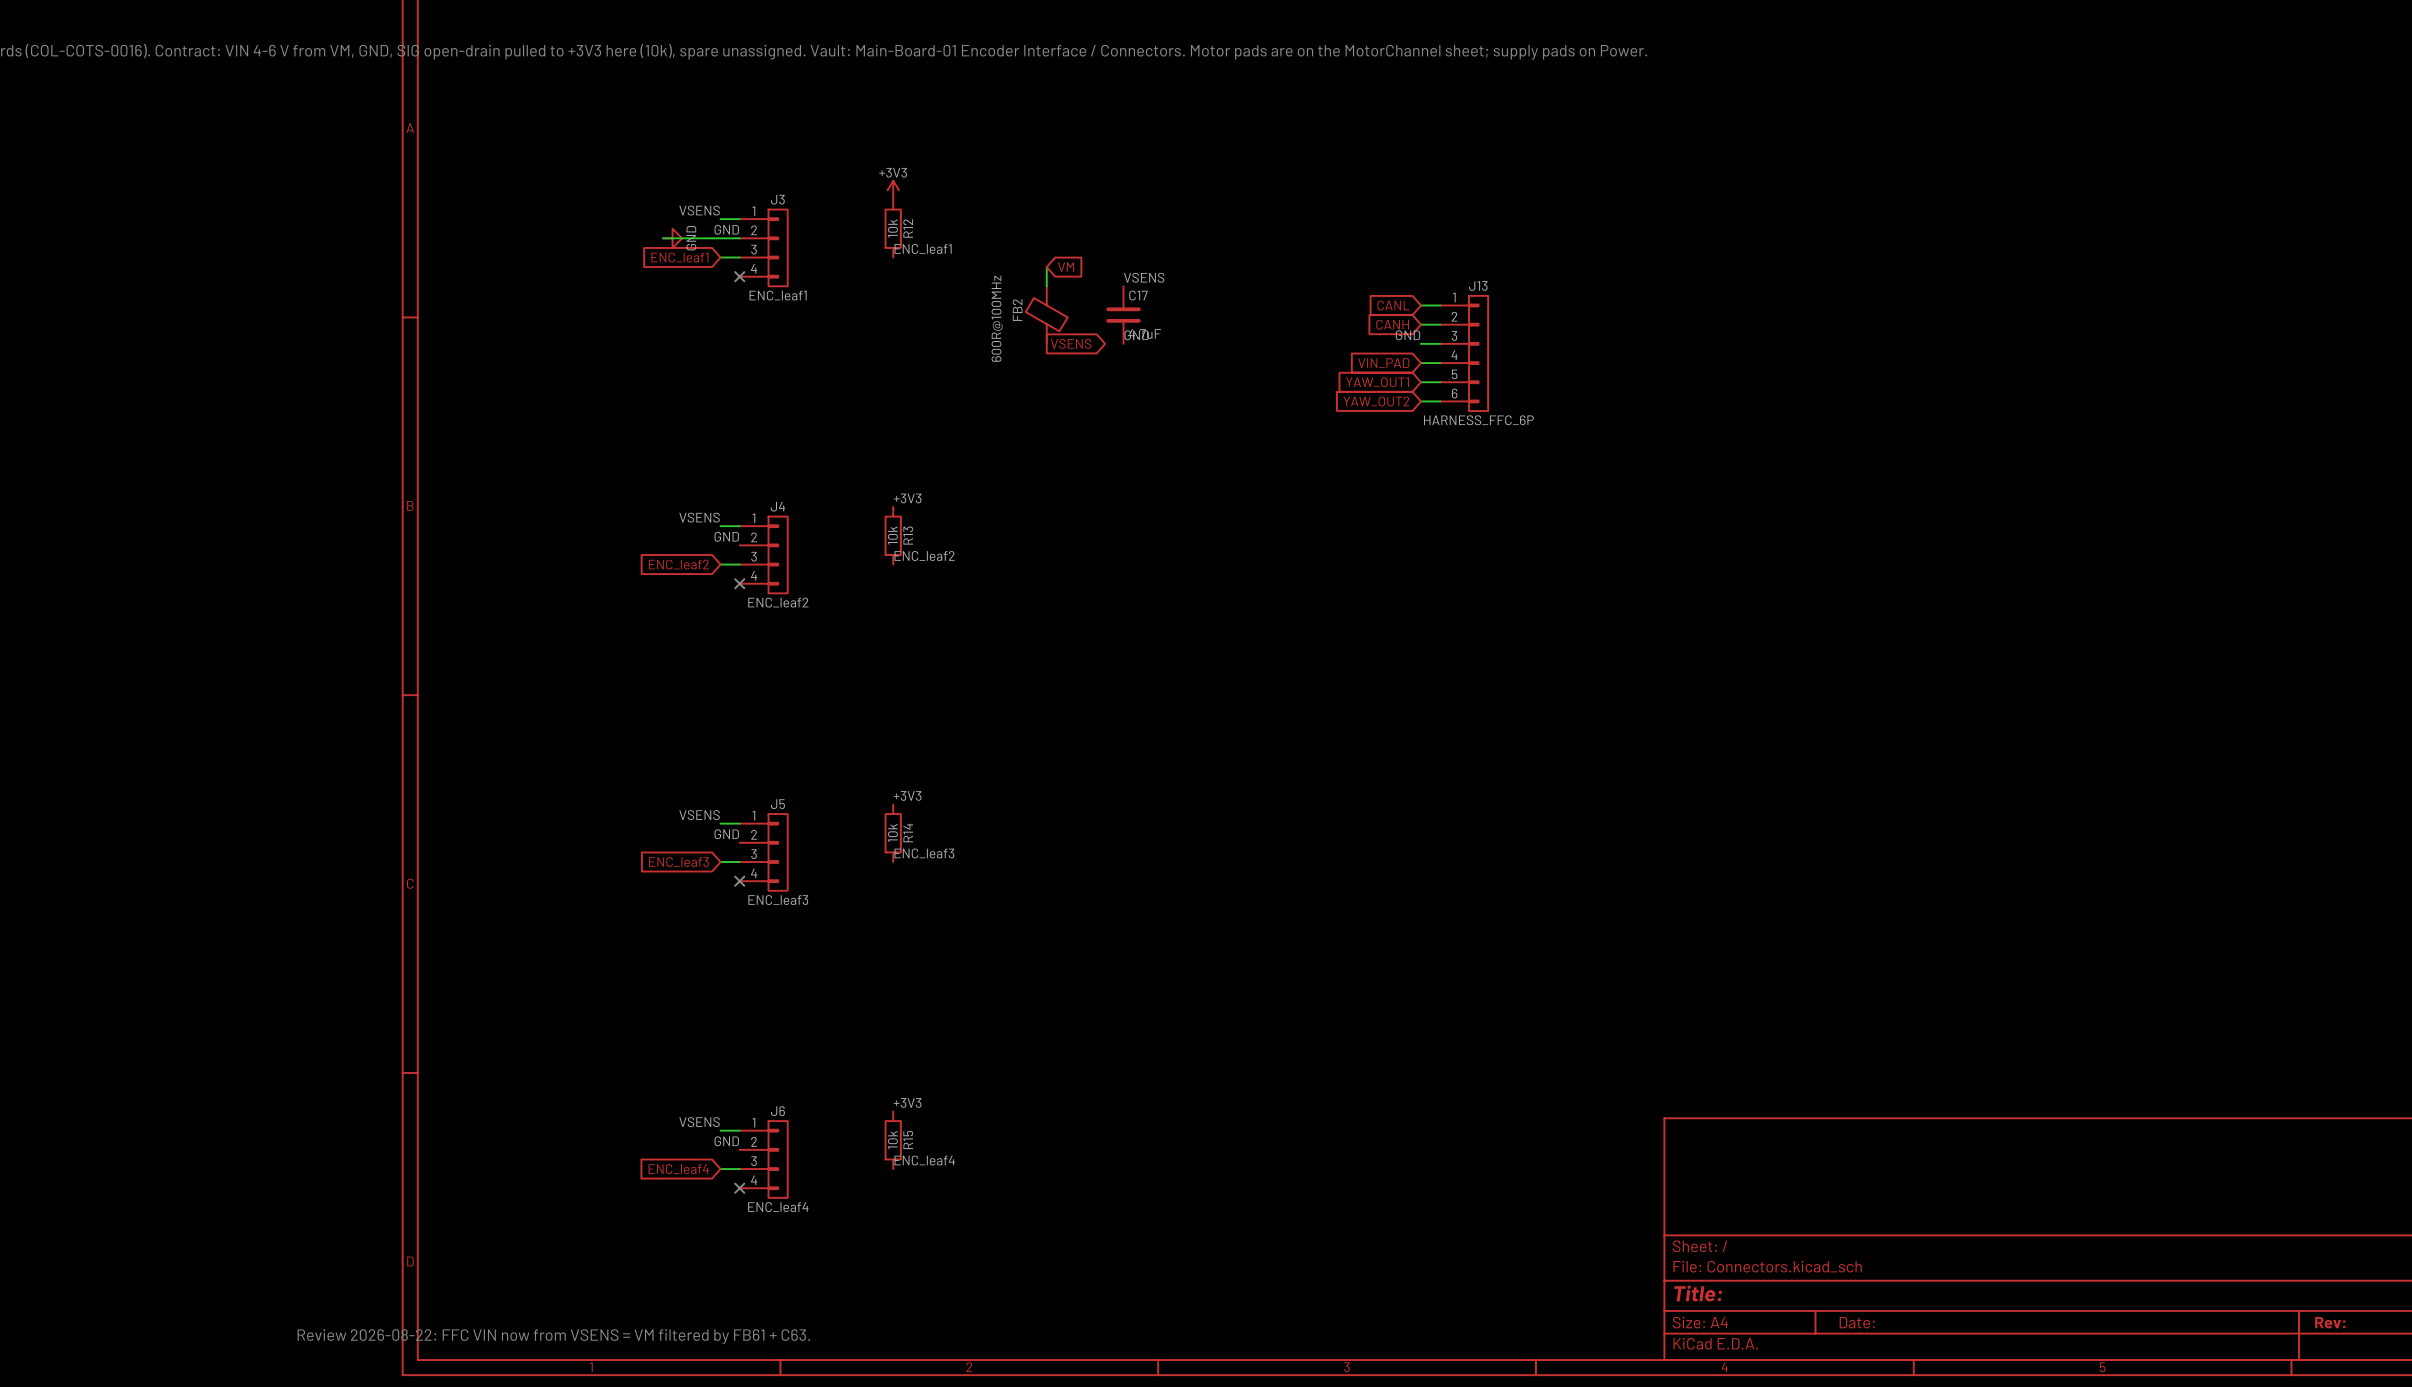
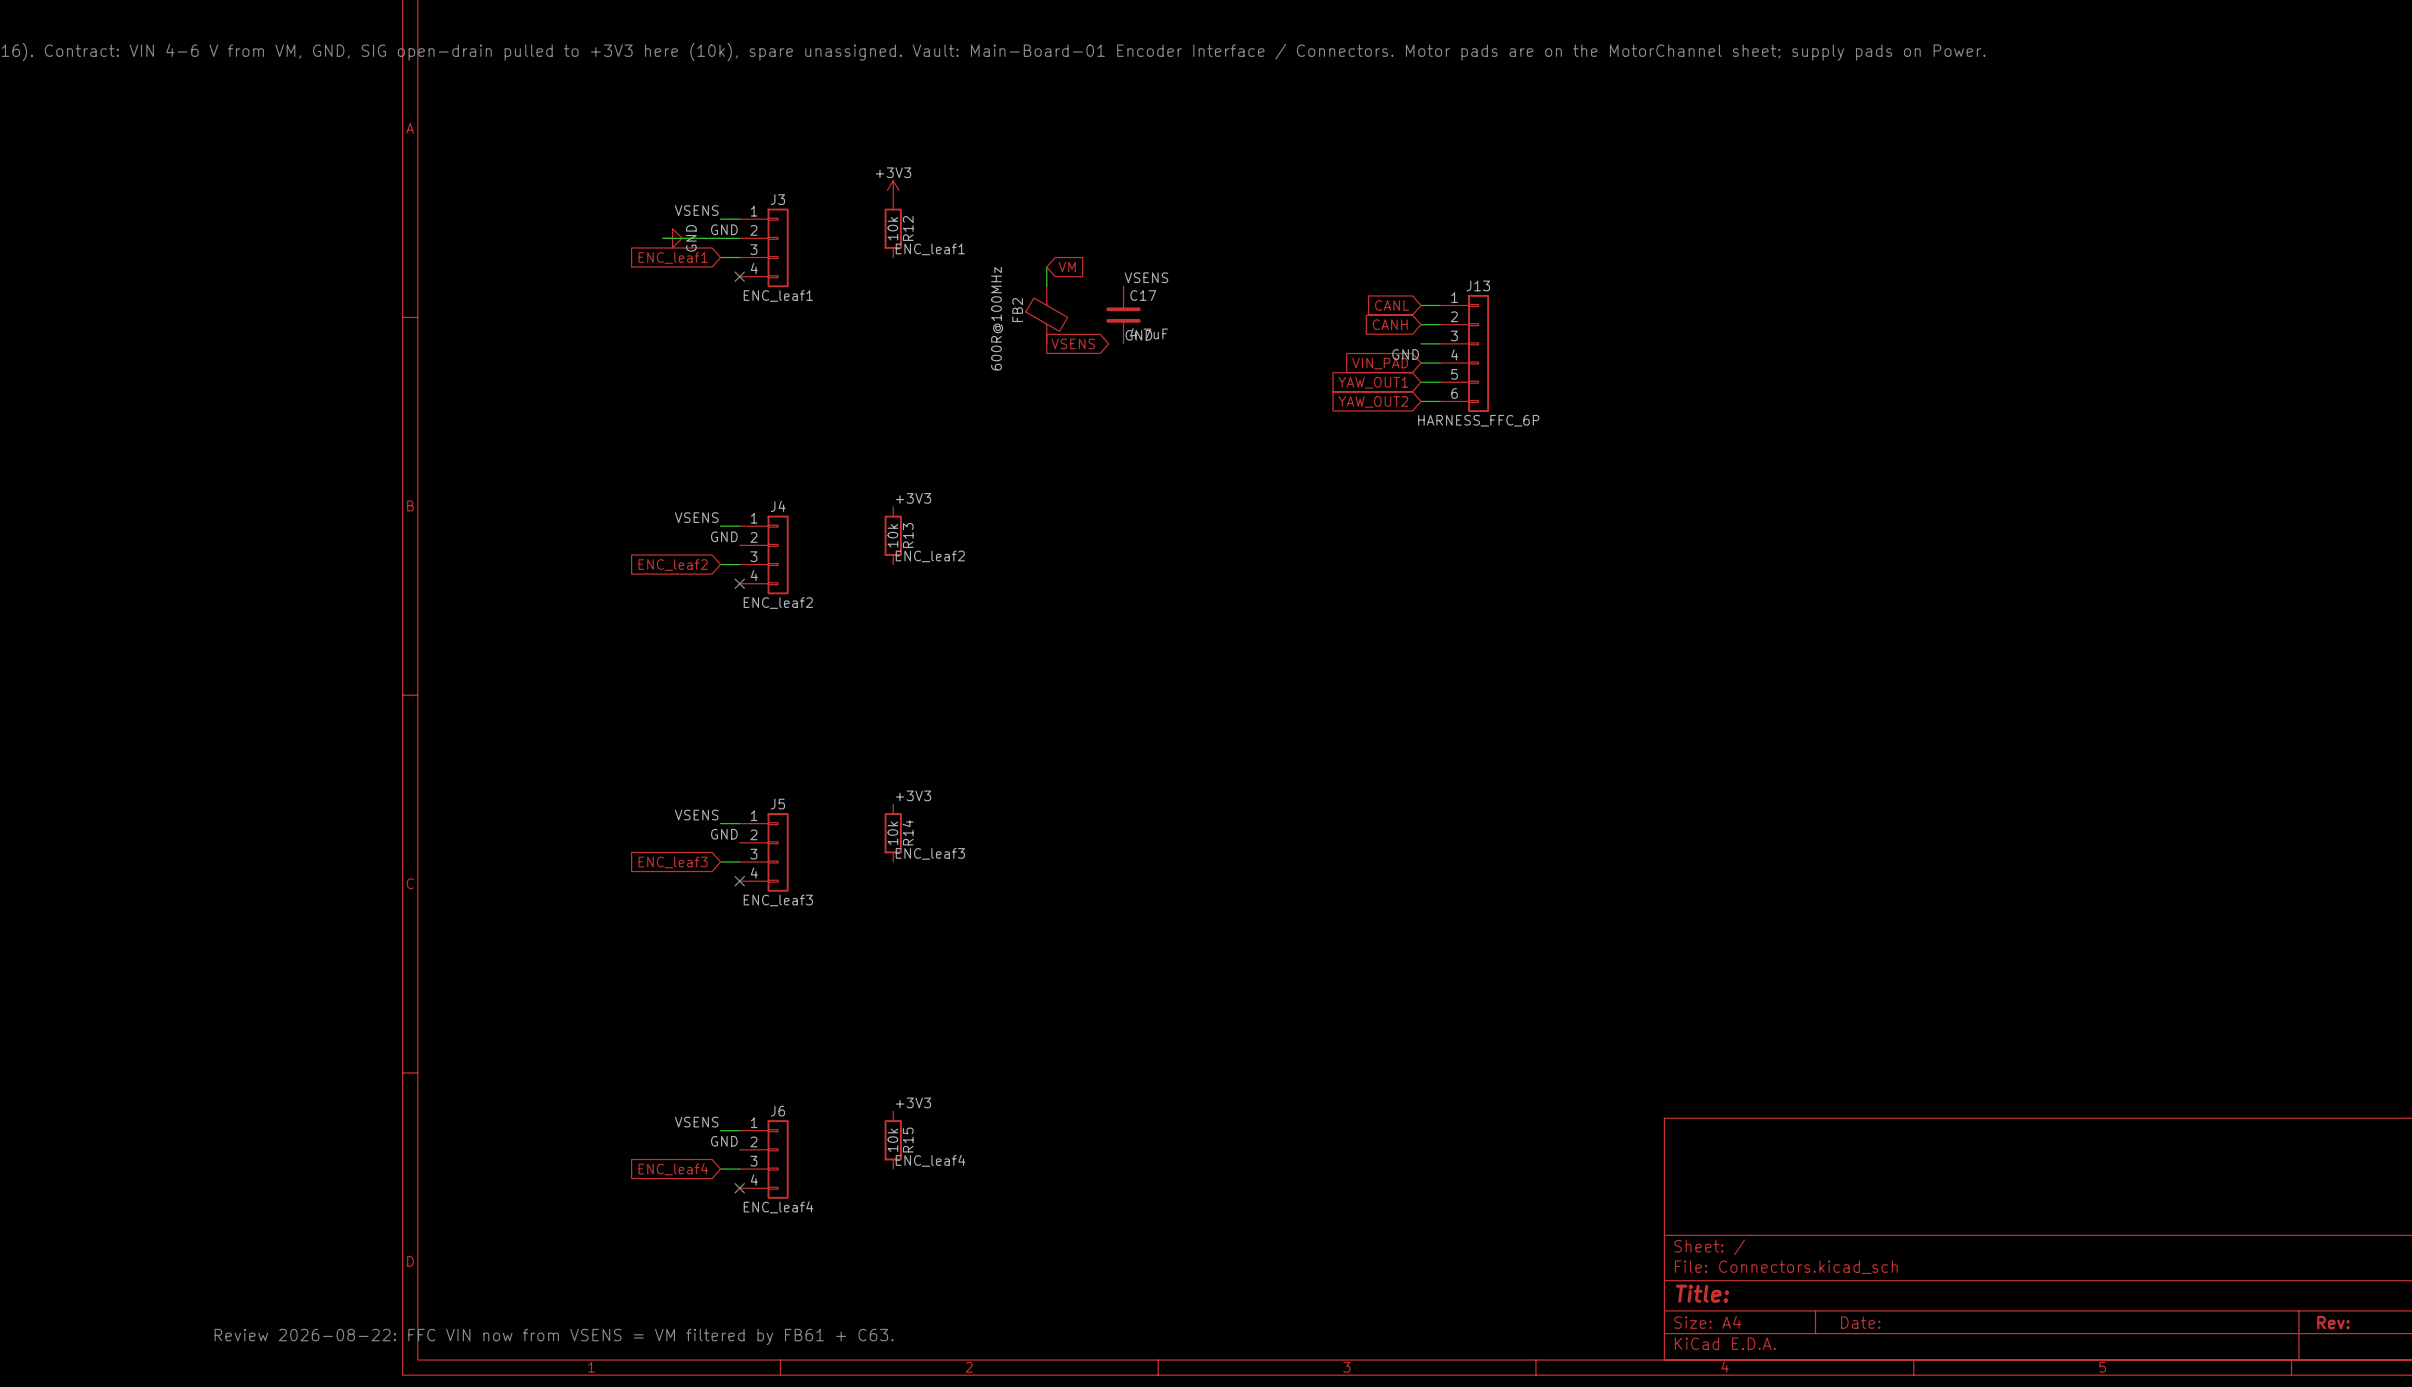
label position: GND (1407, 335) -> GND (1405, 354)

